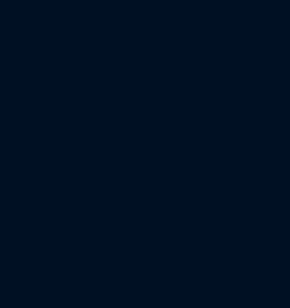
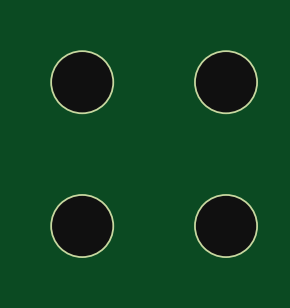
part: none -> (82, 82)
part: none -> (226, 82)
part: none -> (82, 226)
part: none -> (226, 226)

